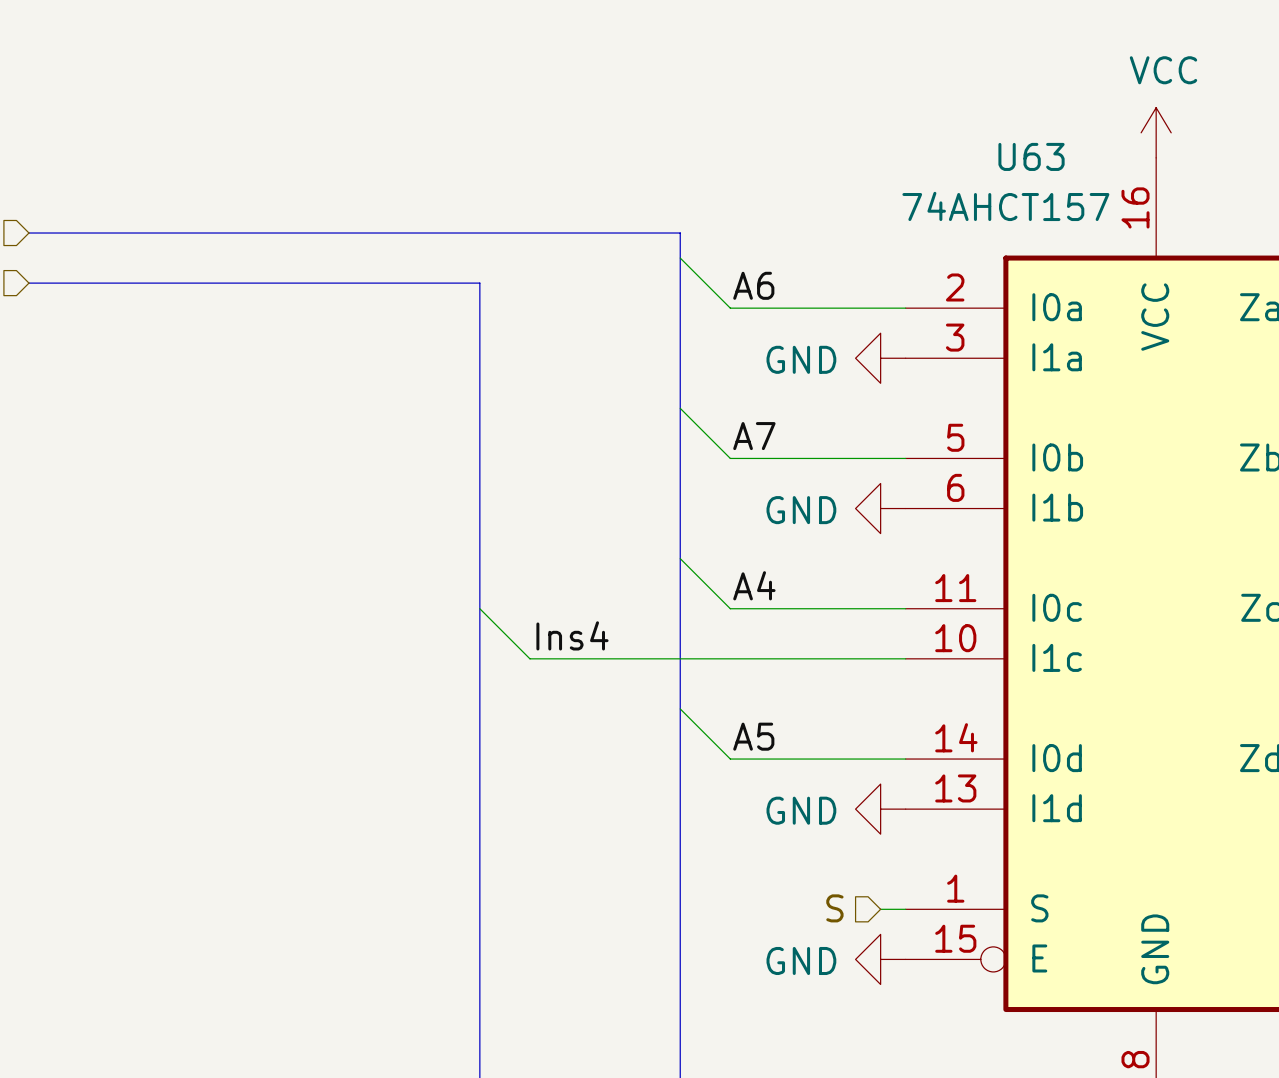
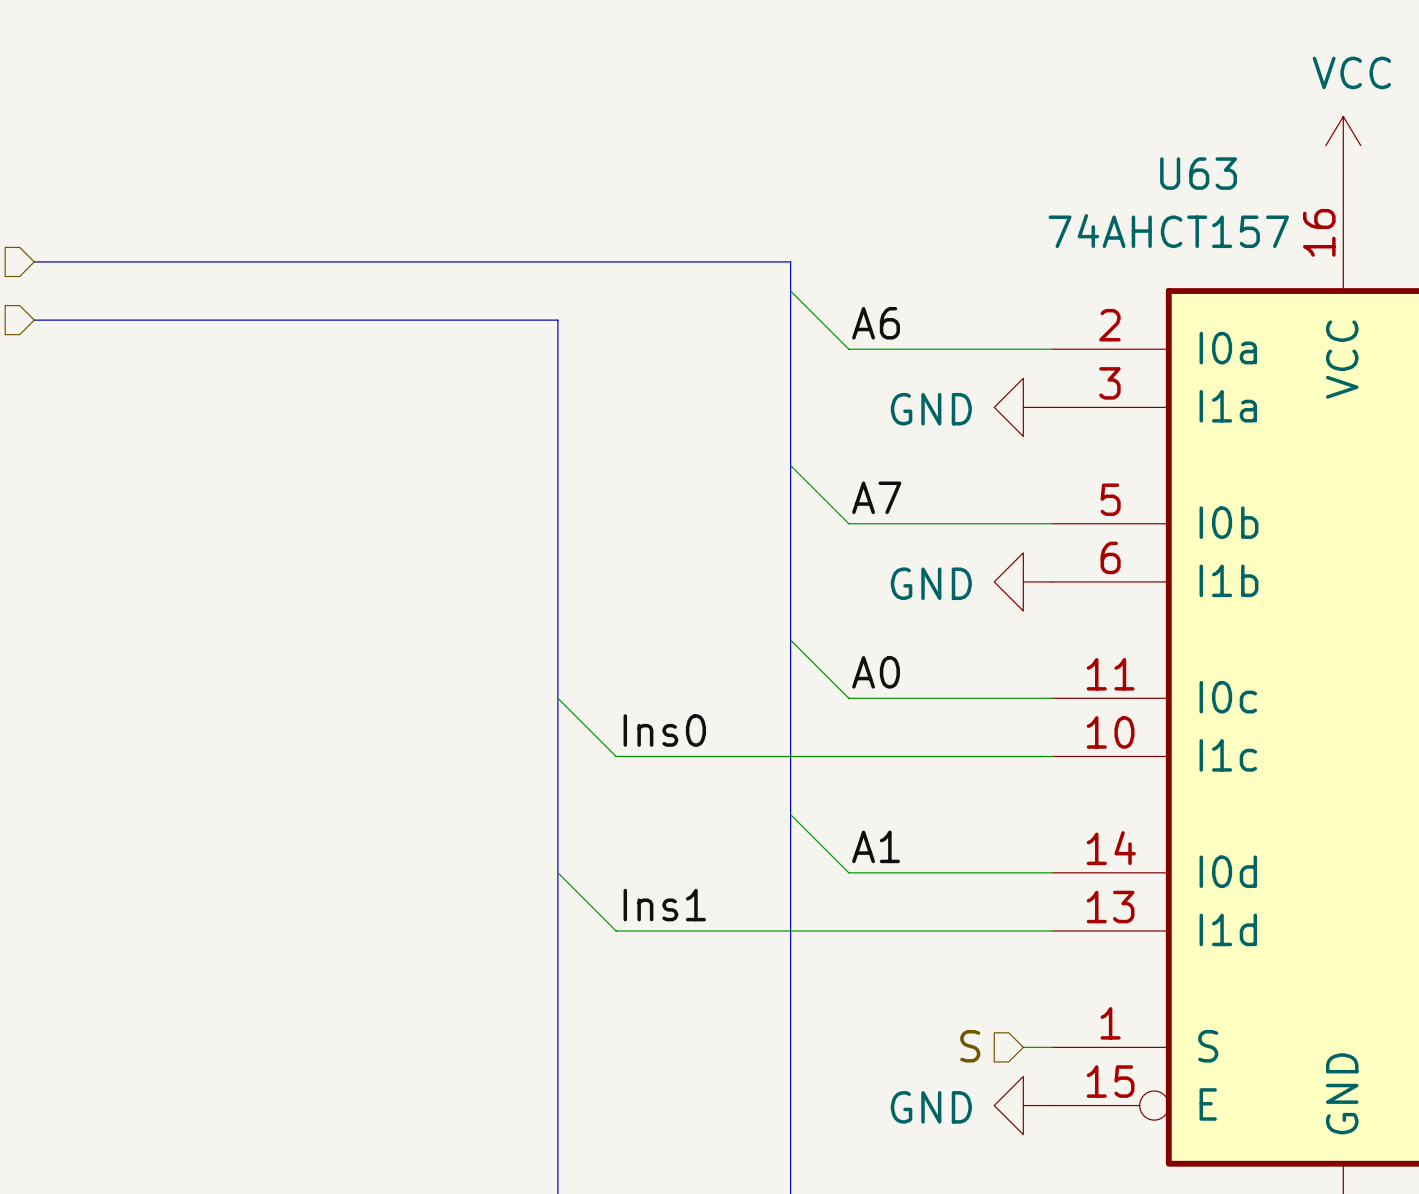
label: A4 (754, 585) -> A0 (876, 672)
label: Ins4 (572, 635) -> Ins0 (664, 730)
label: A5 (753, 736) -> A1 (876, 846)
wire: none -> (557, 872) (616, 931) (1052, 931)
label: none -> Ins1 (664, 905)
power symbol: GND (880, 809) -> none

